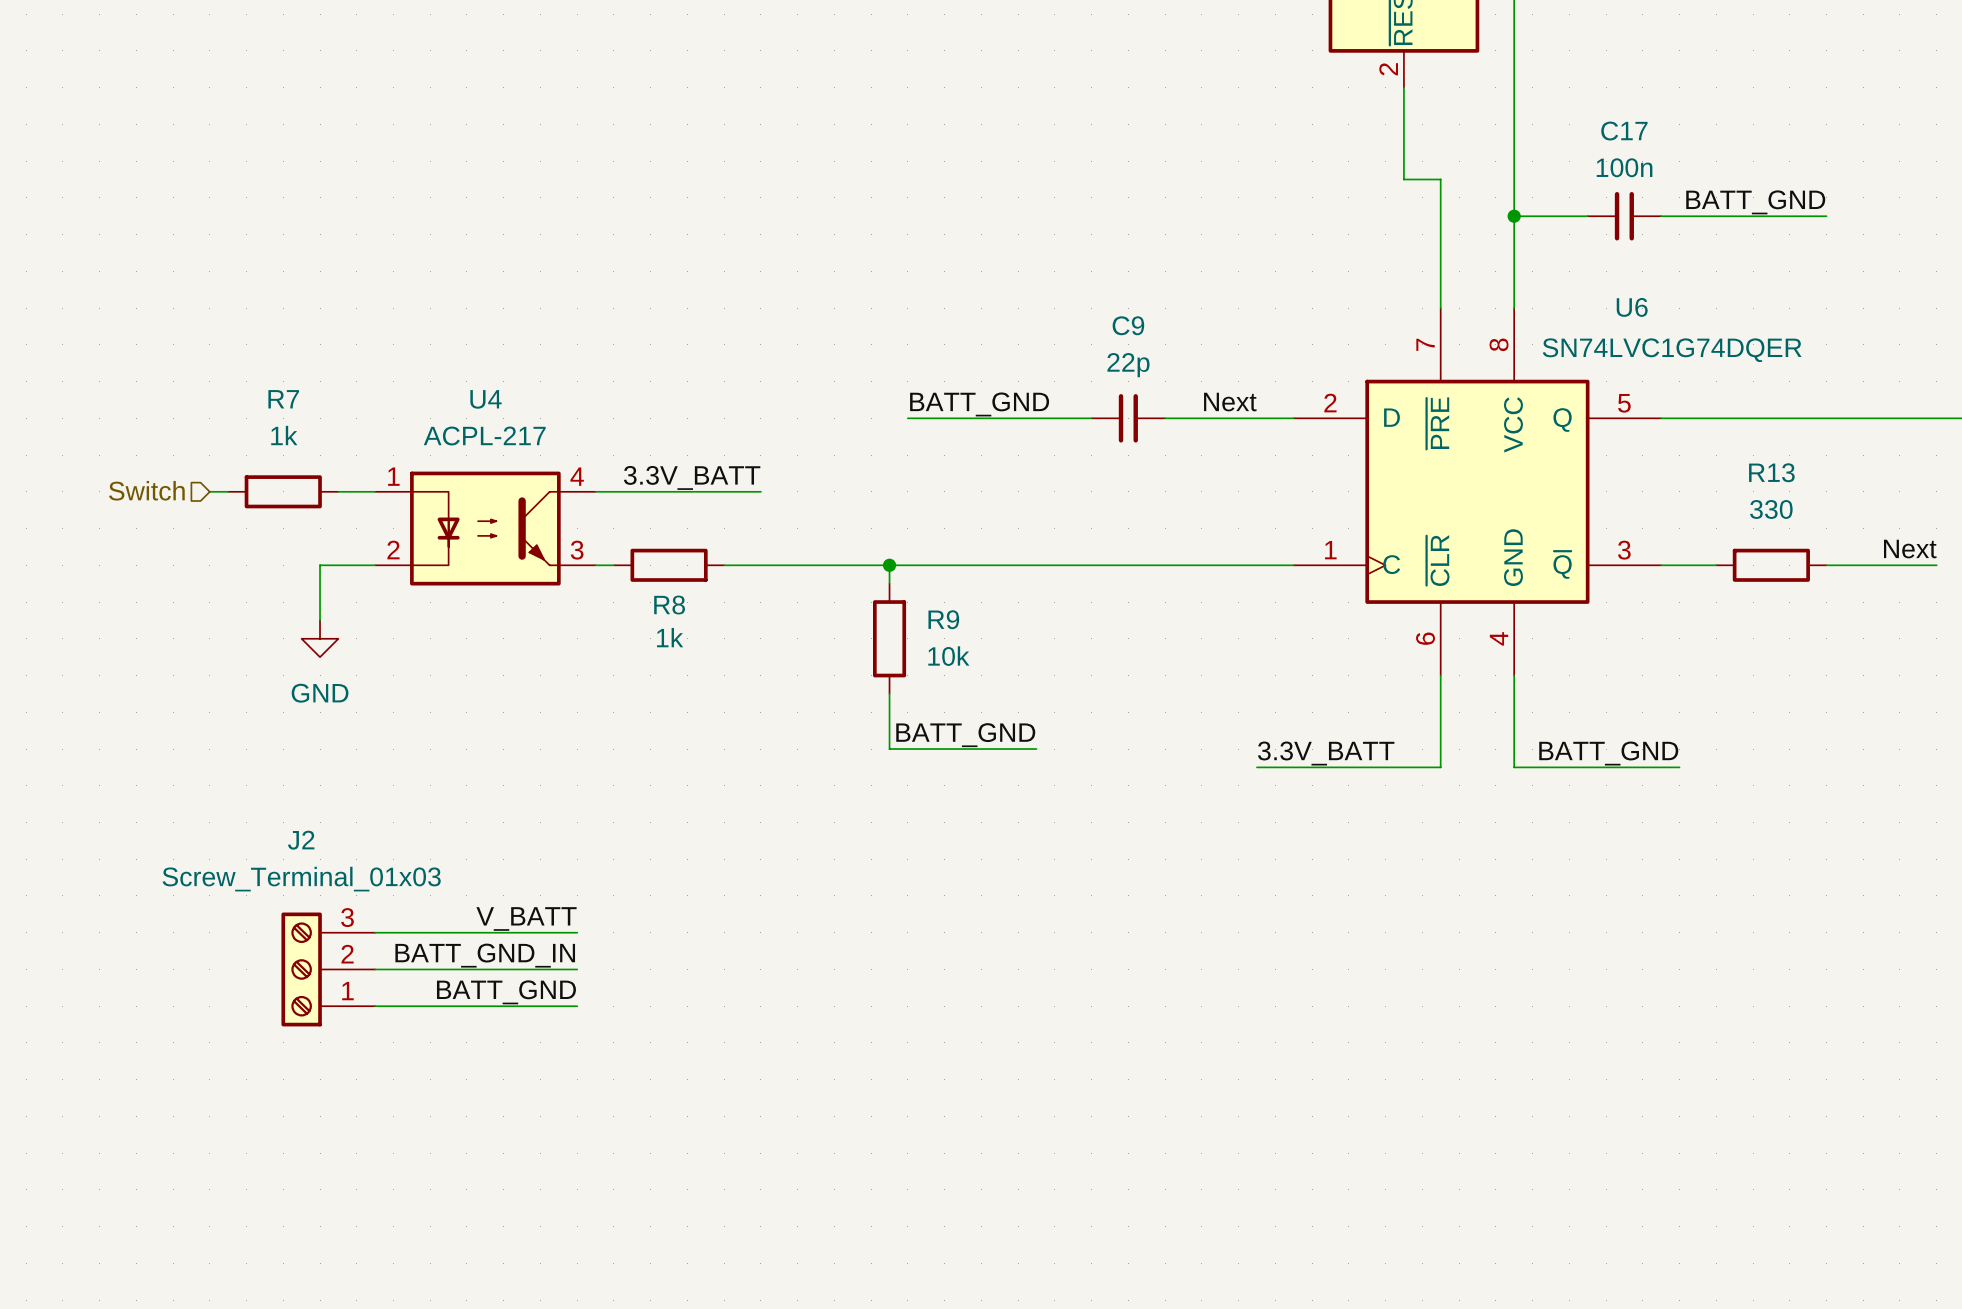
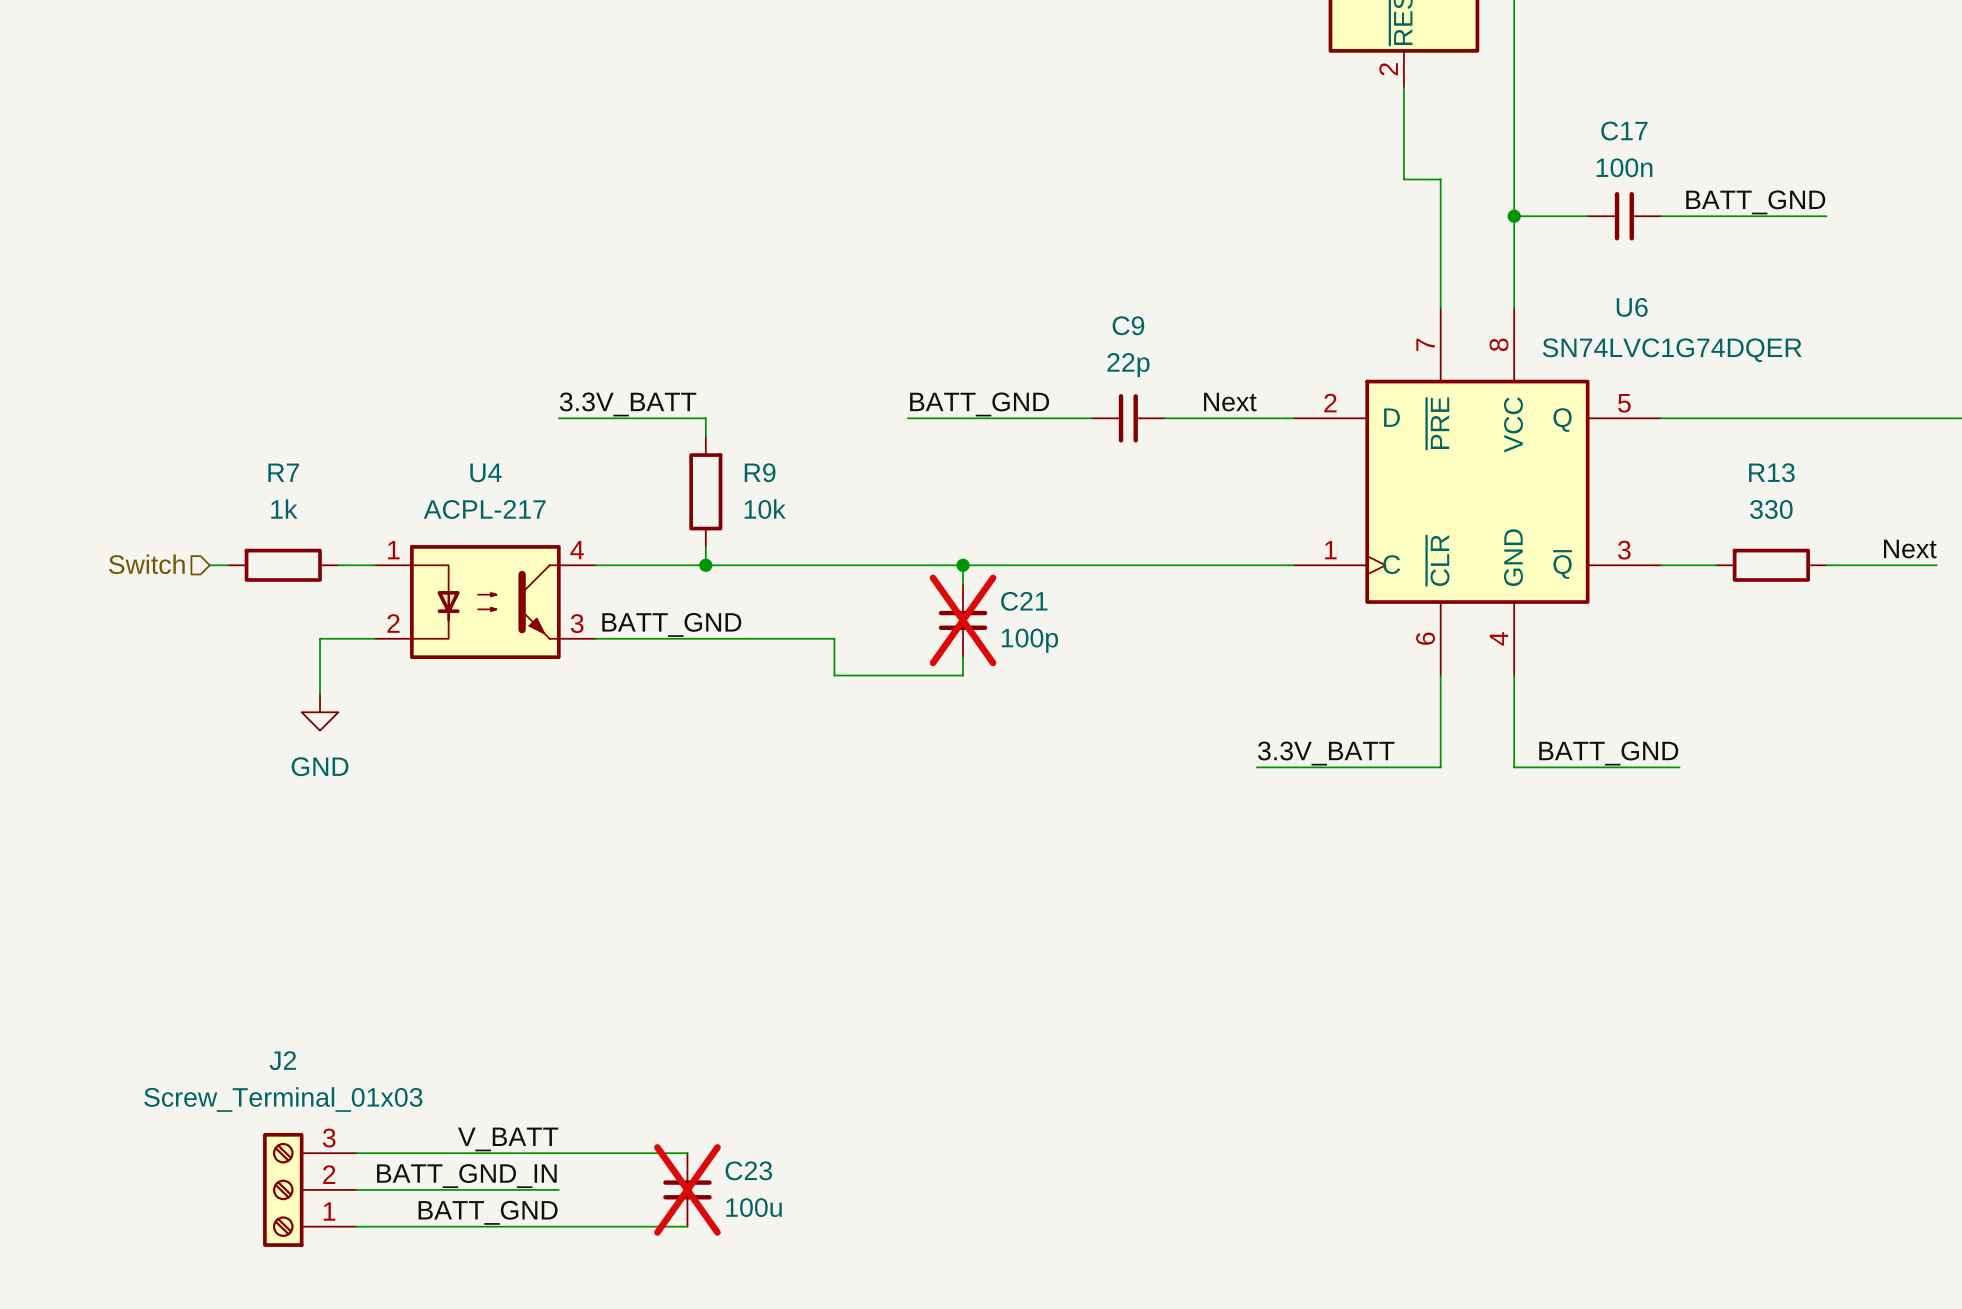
wire: none -> (558, 418) (705, 418) (705, 436)
label position: 3.3V_BATT (692, 477) -> 3.3V_BATT (628, 404)
hierarchical label position: Switch (146, 490) -> Switch (146, 564)
wire: (209, 491) (228, 491) -> (209, 565) (228, 565)
R7 position: (283, 491) -> (283, 565)
wire: (338, 491) (375, 491) -> none
wire: (595, 491) (760, 491) -> none
U4 position: (485, 528) -> (485, 602)
wire: (338, 565) (320, 565) (320, 620) -> none
wire: none -> (613, 565) (724, 565)
R8: 1k (669, 565) -> none
junction: none -> (705, 565)
wire: (889, 565) (889, 583) -> (963, 565) (963, 583)
junction position: (889, 565) -> (963, 565)
C21: none -> 100p (963, 620)
label: none -> BATT_GND (671, 624)
power symbol position: GND (320, 638) -> GND (320, 712)
wire: none -> (375, 638) (320, 638) (320, 693)
wire: none -> (595, 638) (834, 638) (834, 675) (963, 675) (963, 657)
R9 position: (889, 638) -> (705, 491)
wire: (889, 693) (889, 749) (1036, 749) -> none
label: BATT_GND (965, 735) -> none
label position: V_BATT (526, 918) -> V_BATT (508, 1139)
wire: (375, 932) (577, 932) -> none
label position: BATT_GND_IN (485, 955) -> BATT_GND_IN (466, 1176)
J2 position: (328, 969) -> (309, 1189)
wire: (375, 969) (577, 969) -> none
label: BATT_GND (506, 992) -> none
wire: (375, 1006) (577, 1006) -> (356, 1189) (558, 1189)
wire: none -> (356, 1153) (687, 1153)
C23: none -> 100u (687, 1189)
label: none -> BATT_GND (488, 1212)
wire: none -> (356, 1226) (687, 1226)

